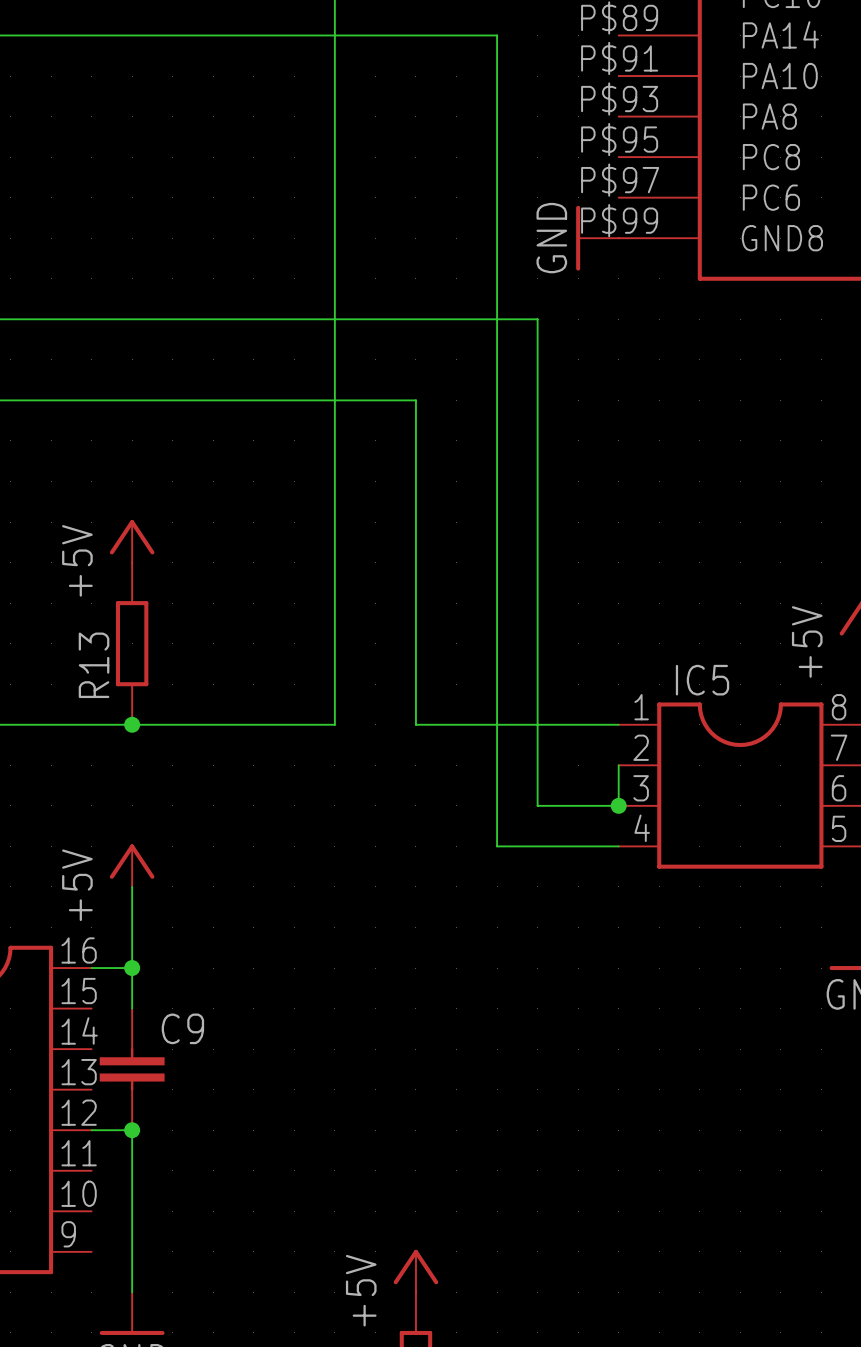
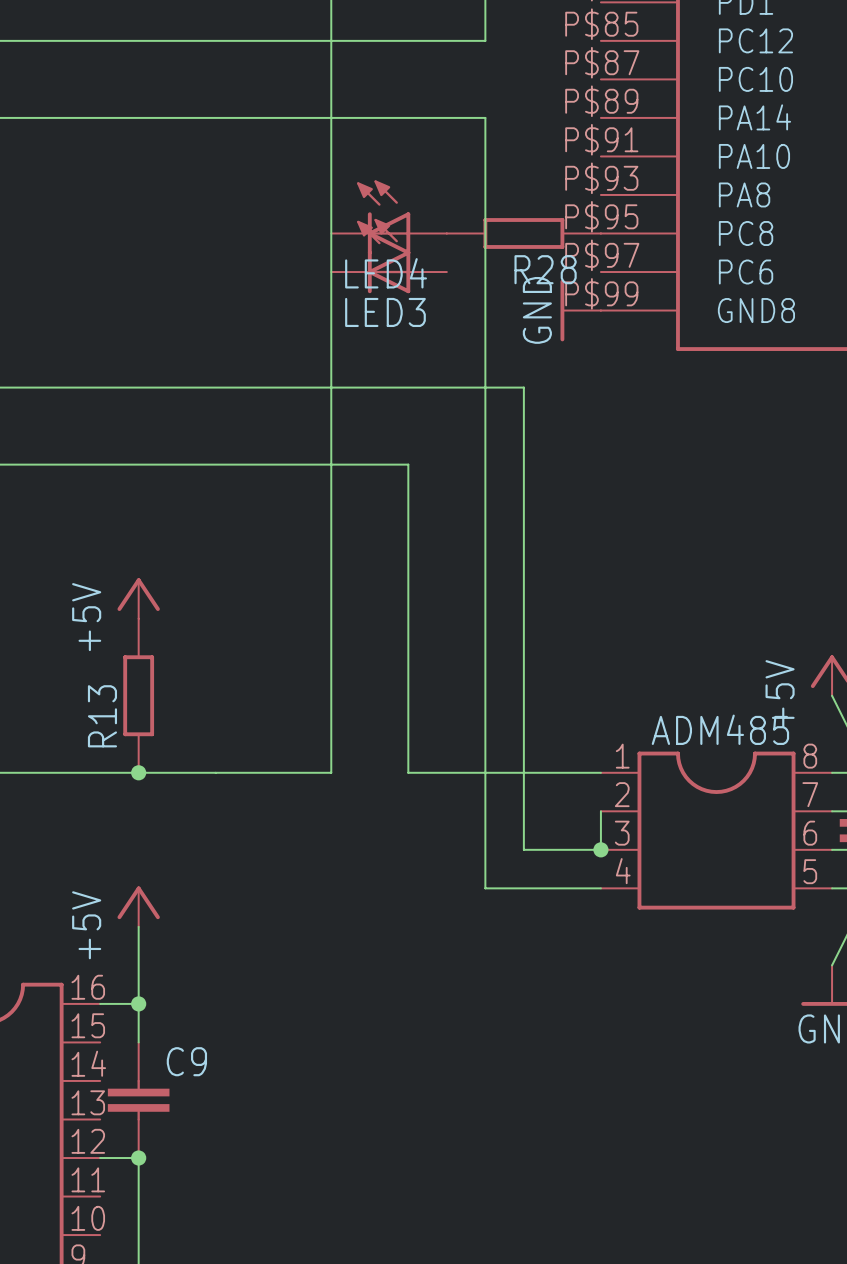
LED4: none -> (389, 217)
R28: none -> (523, 233)
LED3: none -> (389, 256)
IC5 name: IC5 (702, 680) -> ADM485 (720, 729)

